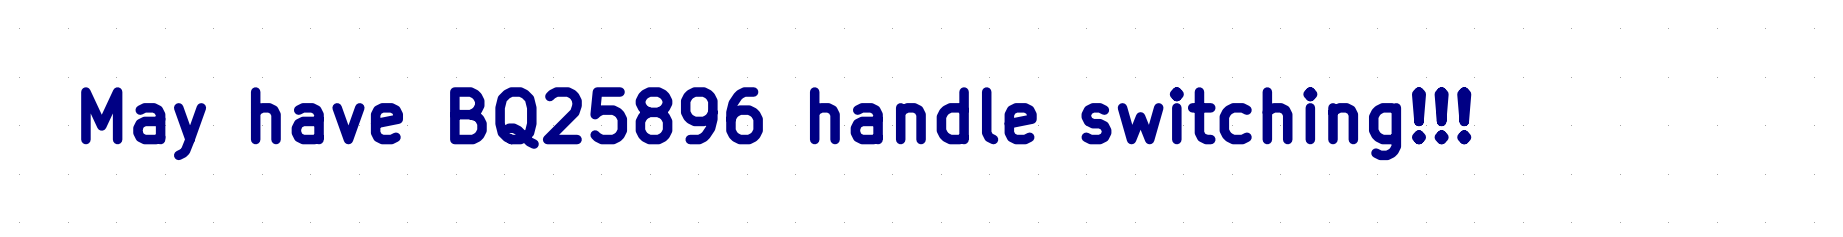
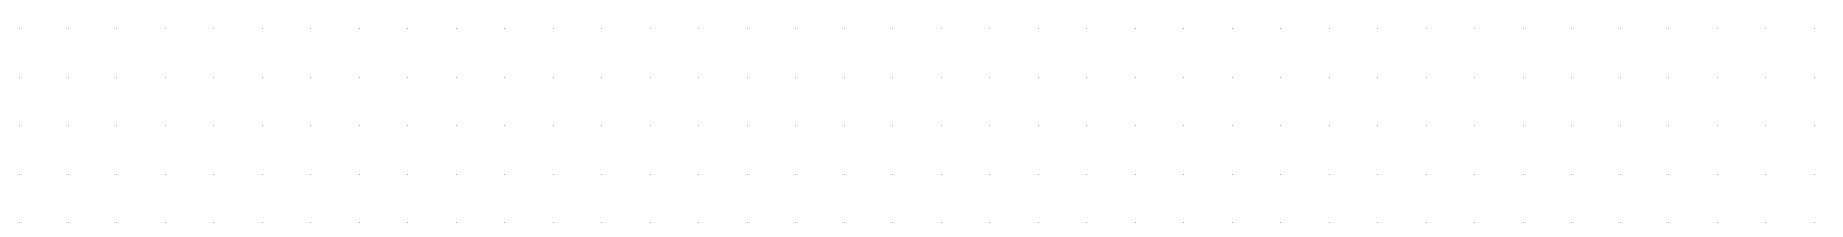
text: May have BQ25896 handle switching!!! (776, 123) -> none

